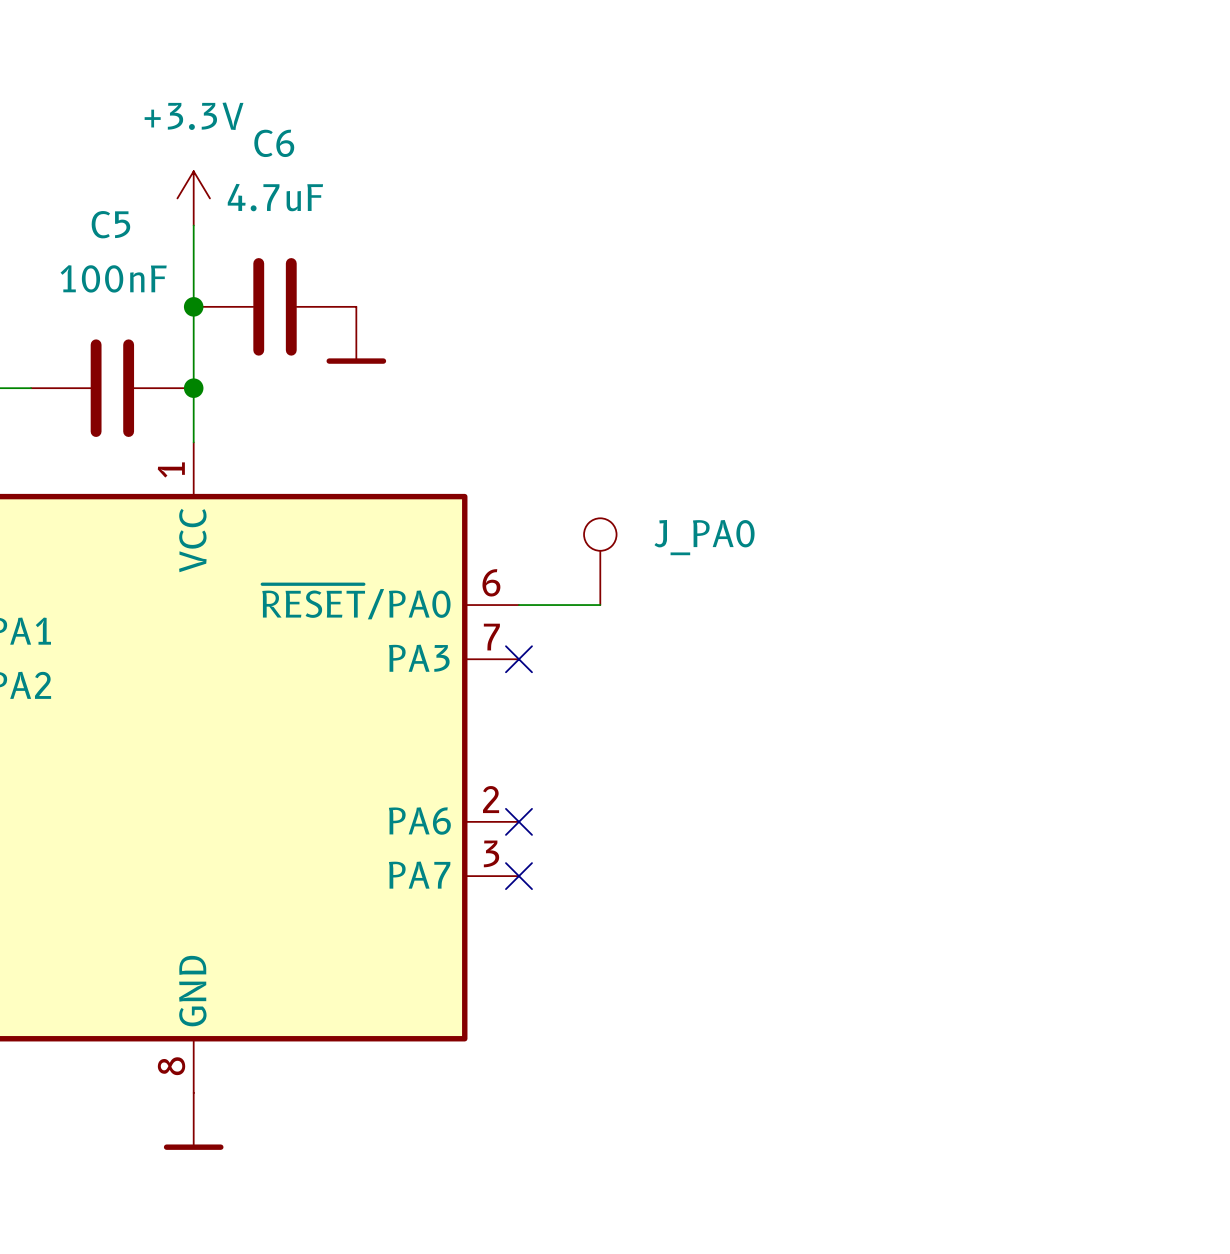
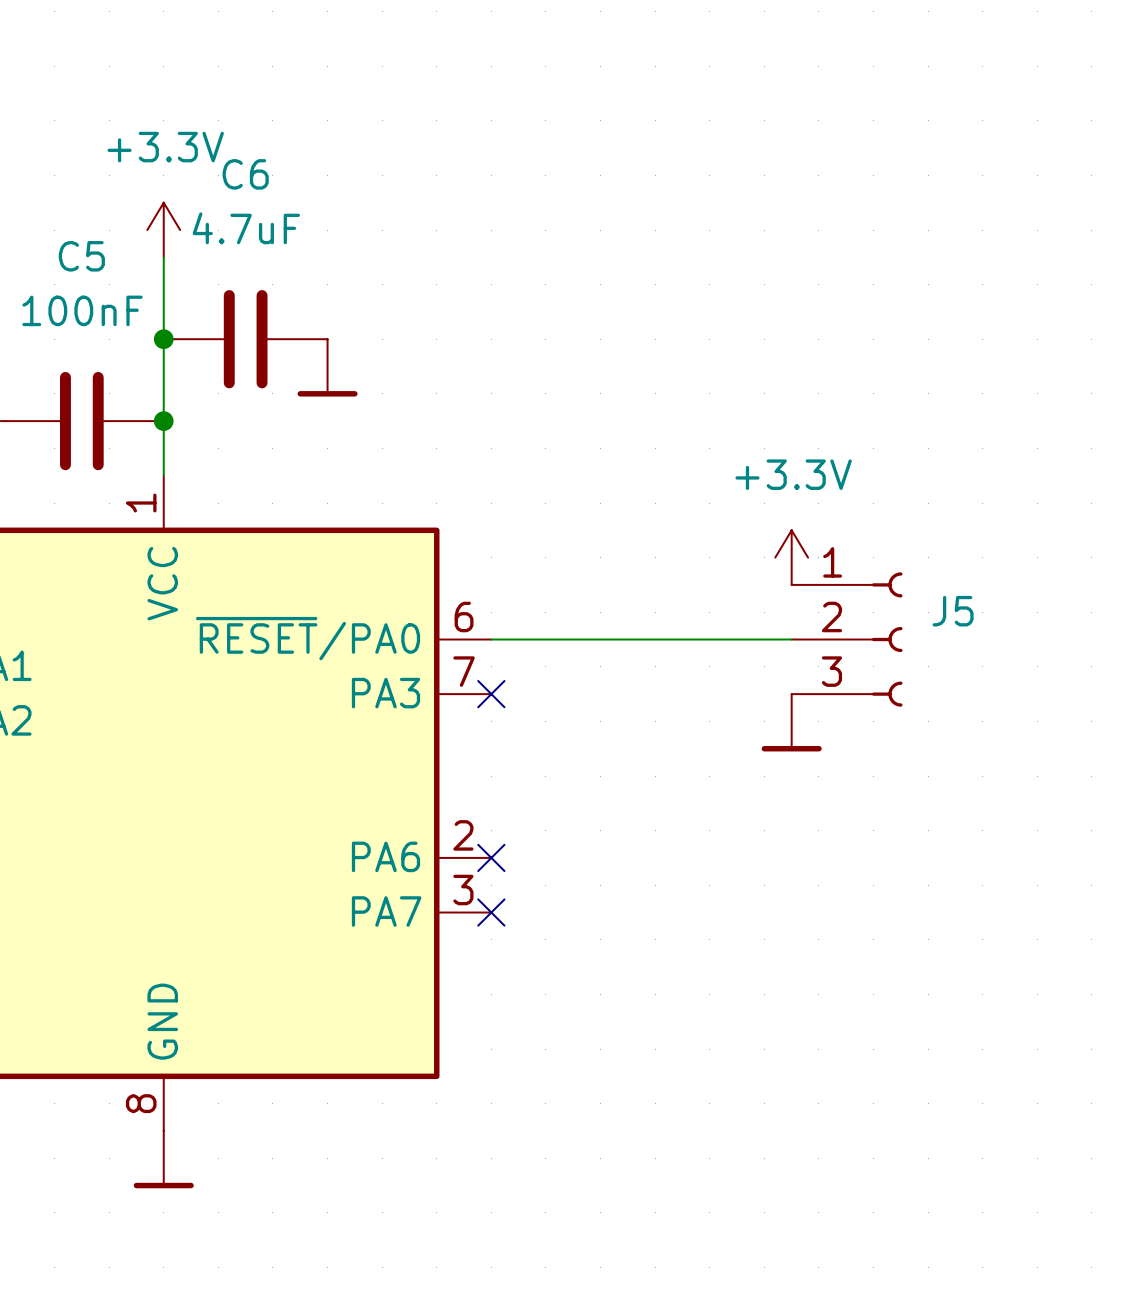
power symbol: none -> +3.3V (791, 557)
J_PA0: (600, 561) -> none
wire: none -> (573, 639) (791, 639)
J5: none -> (847, 639)
power symbol: none -> (791, 722)

